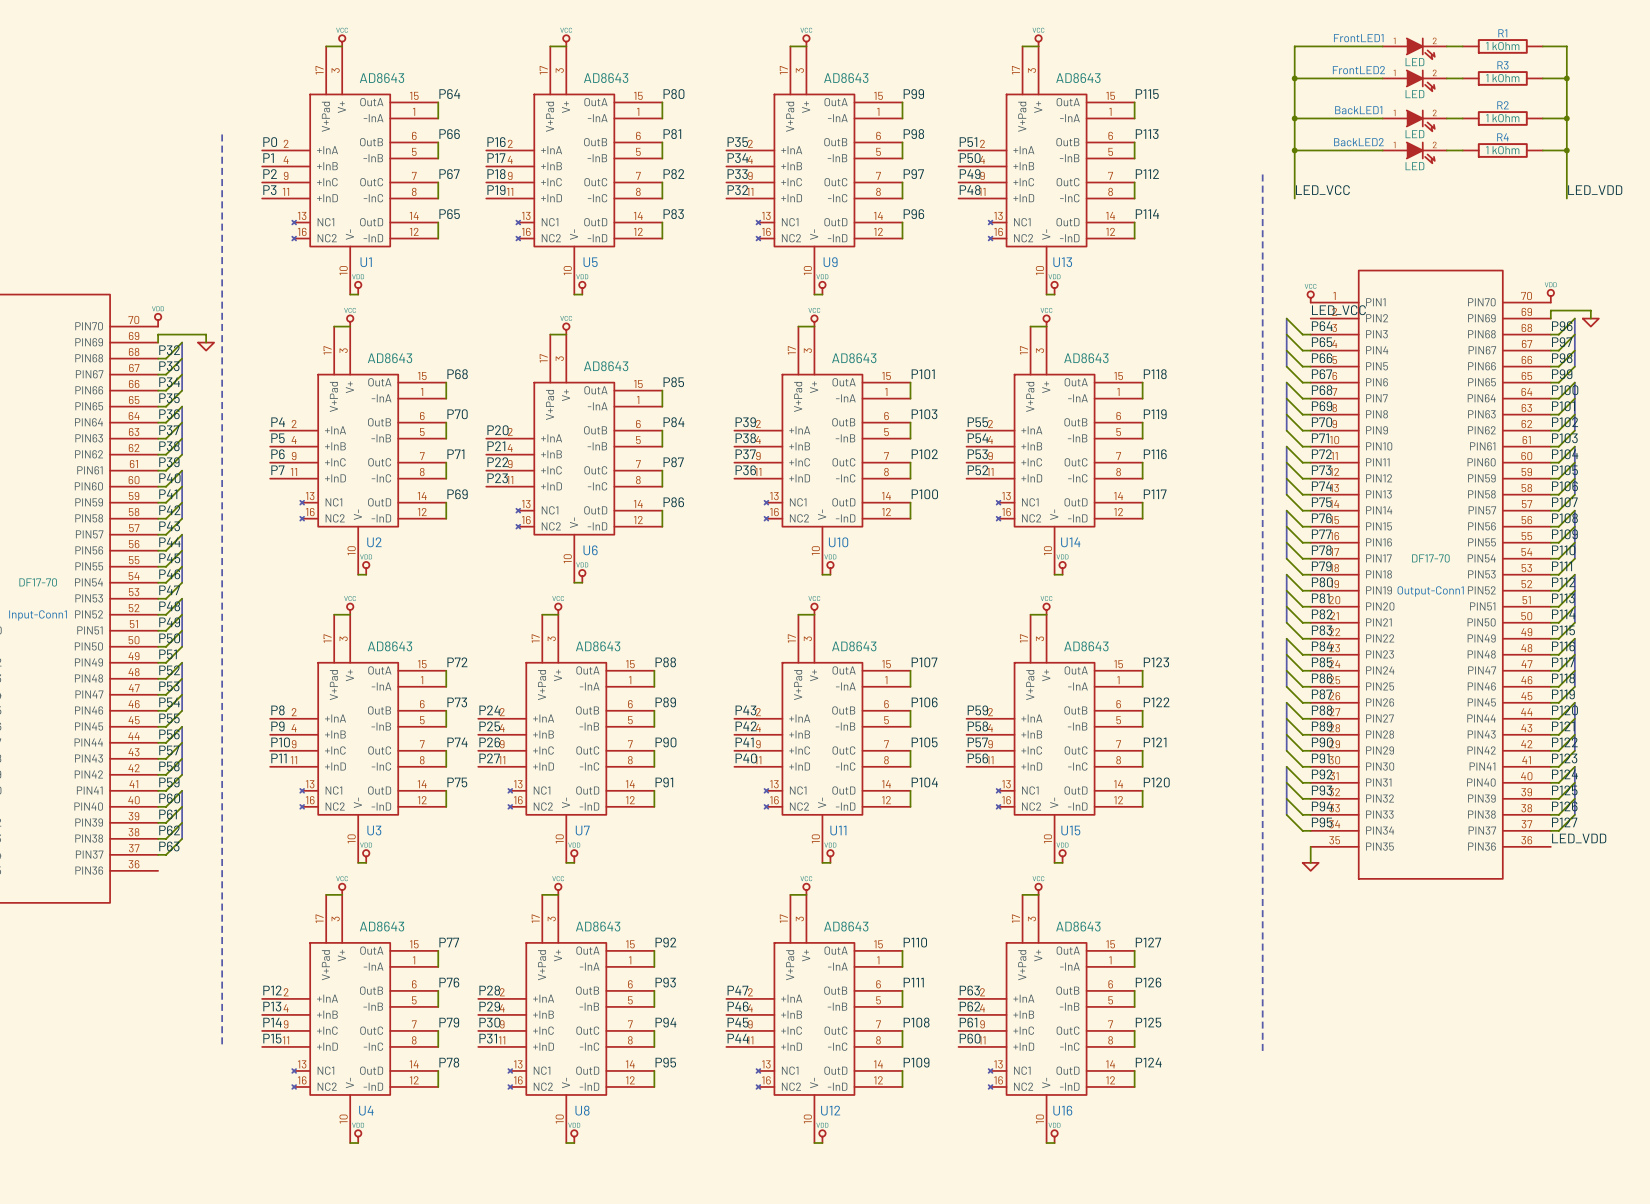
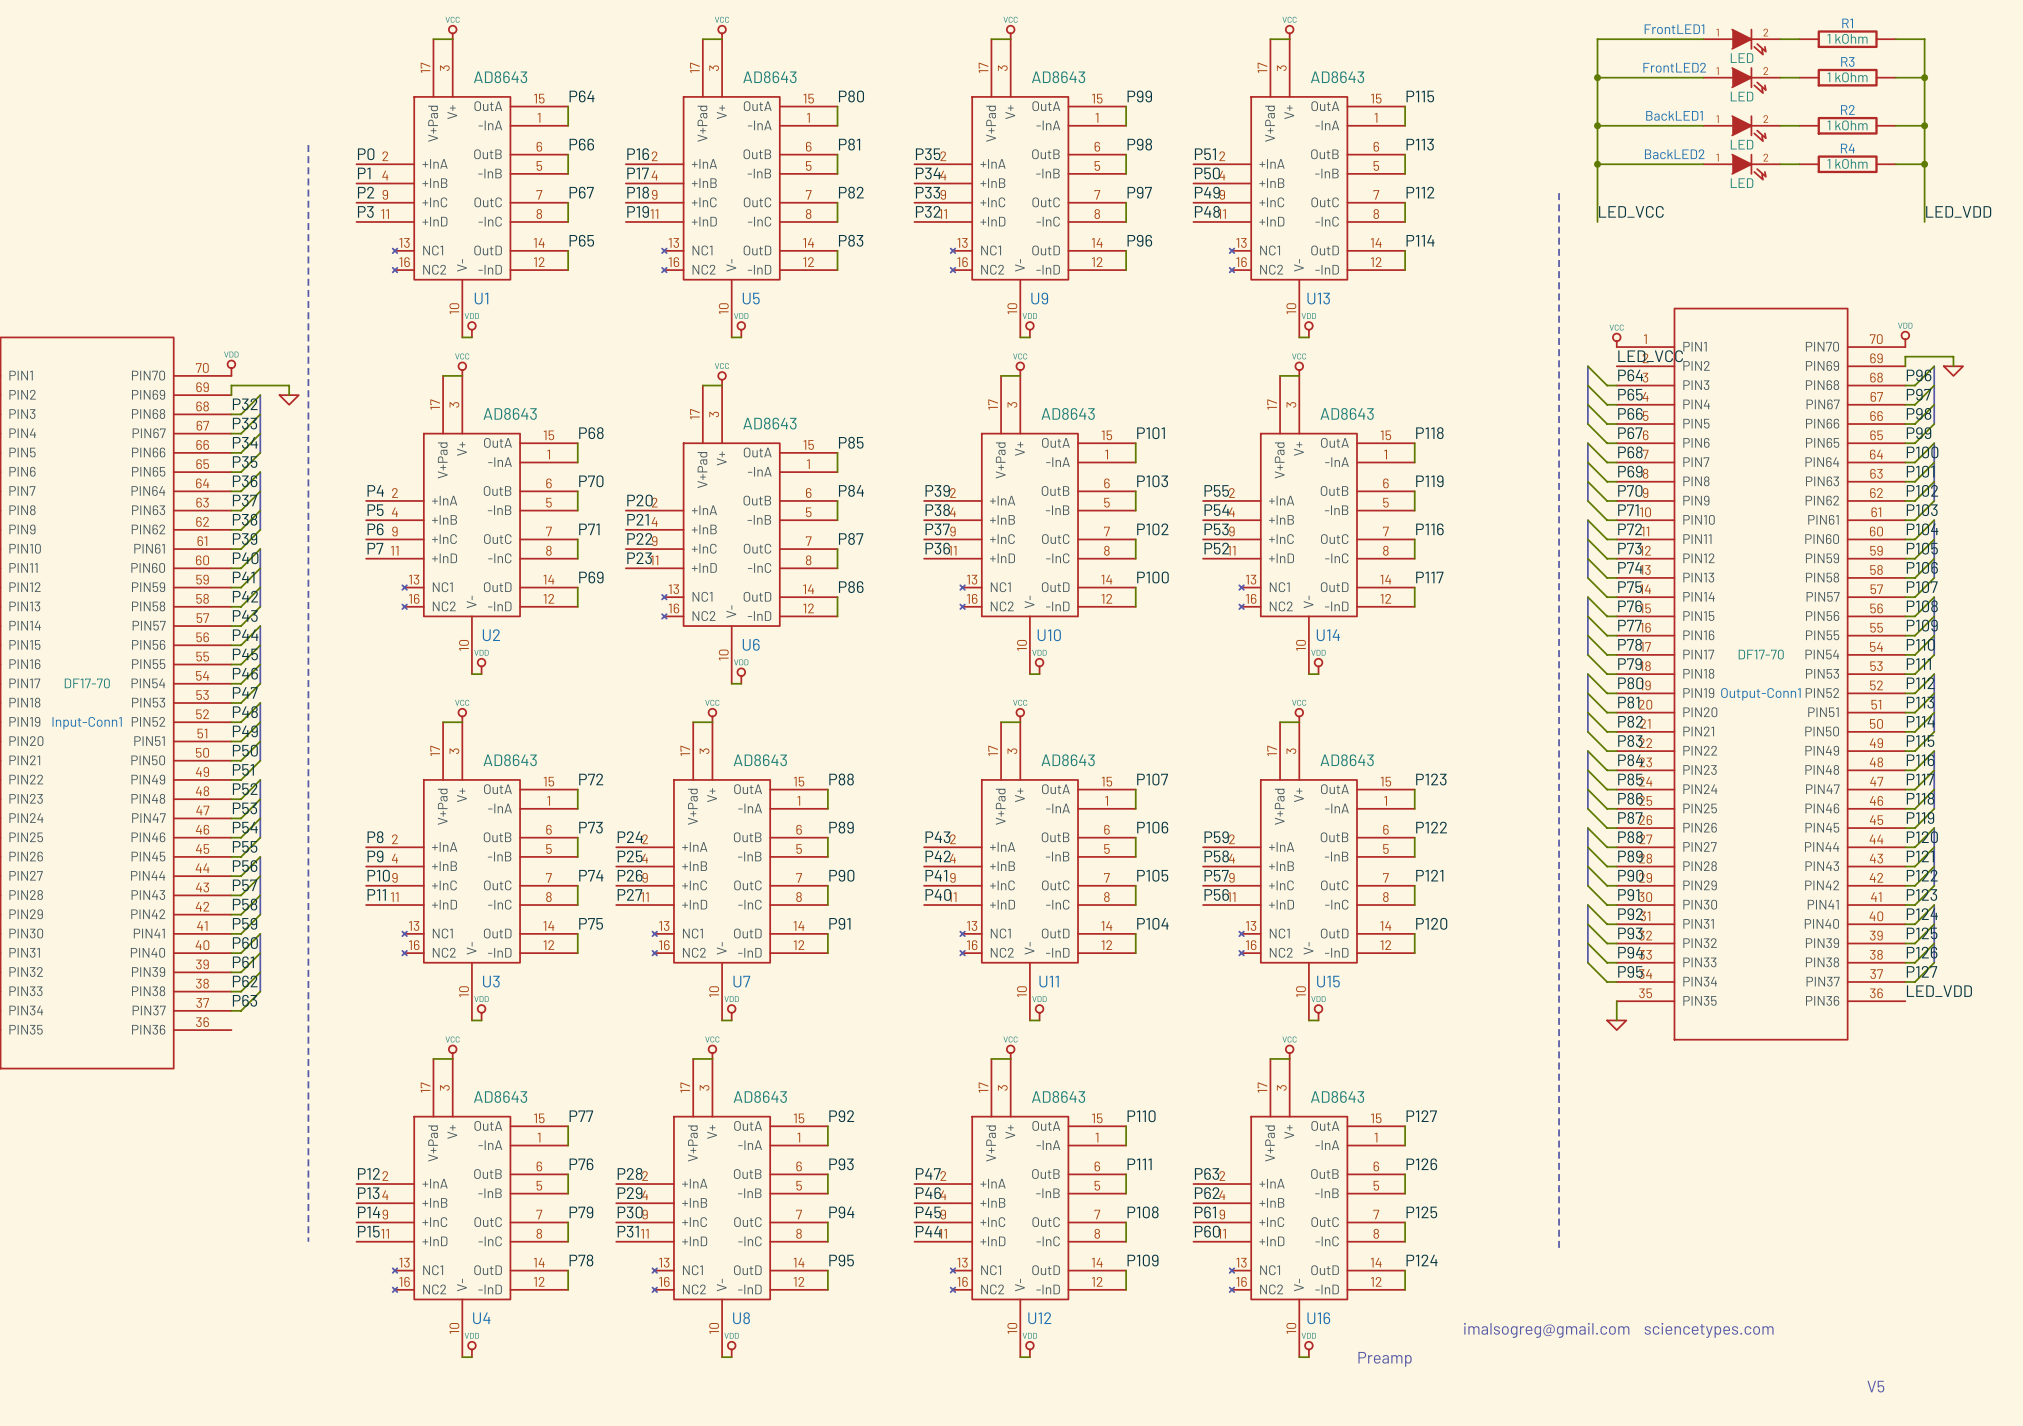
text: none -> imalsogreg@gmail.com sciencetypes.com (1618, 1330)
text: none -> Preamp (1385, 1359)
text: none -> V5 (1875, 1386)

